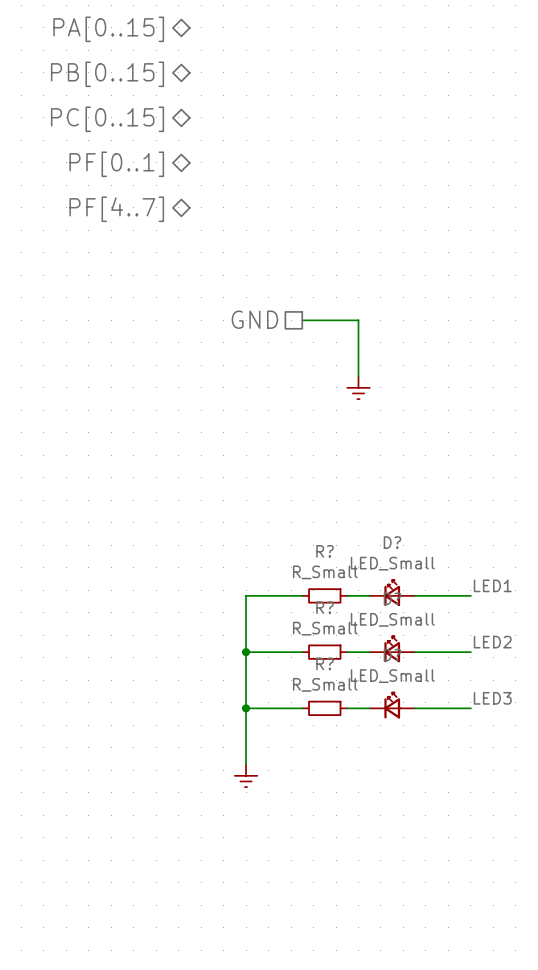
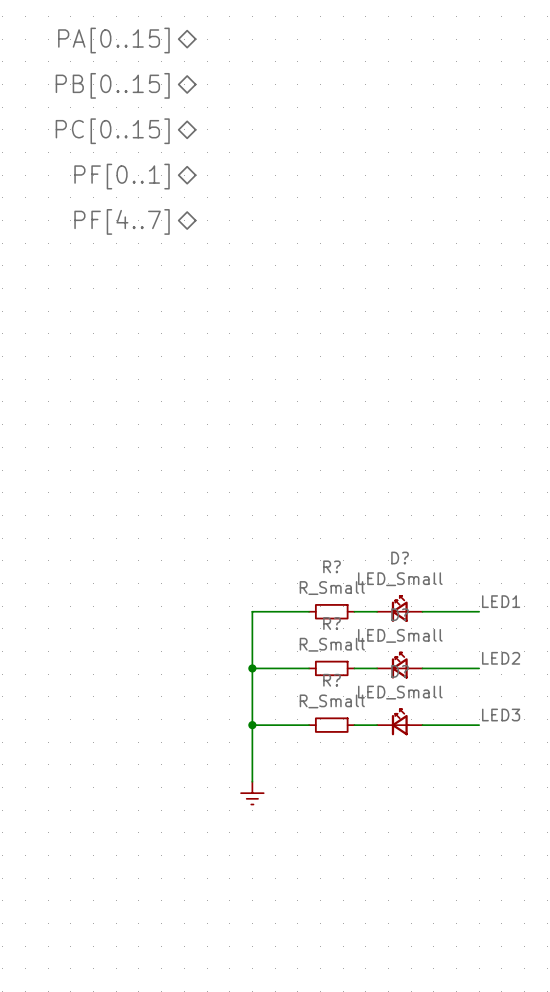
hierarchical label: GND (254, 319) -> none
wire: (302, 320) (358, 320) (358, 376) -> none
power symbol: (358, 387) -> none

